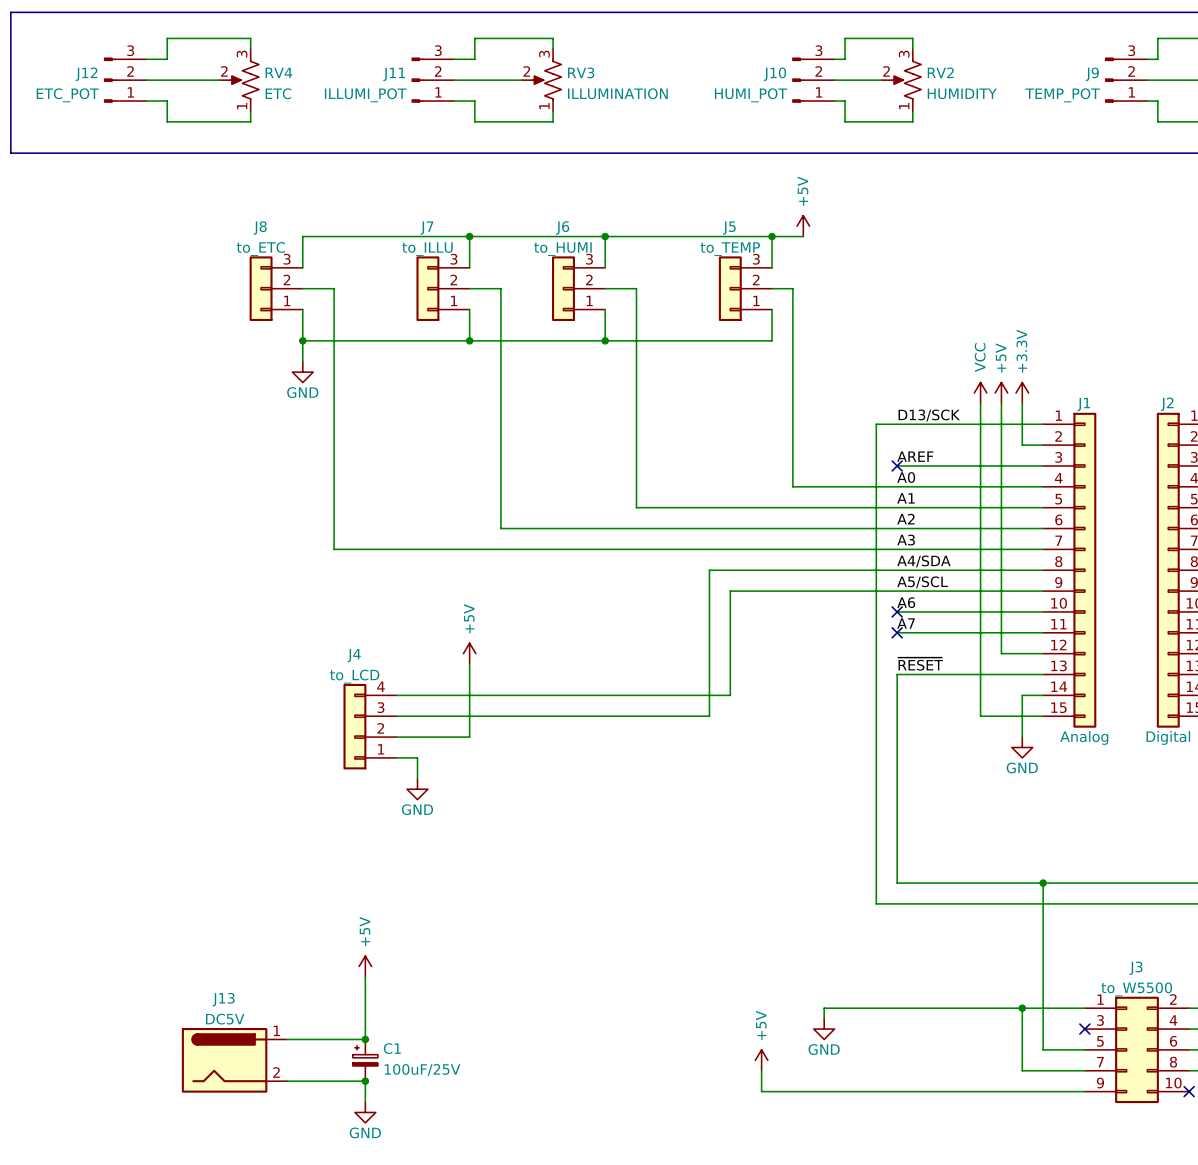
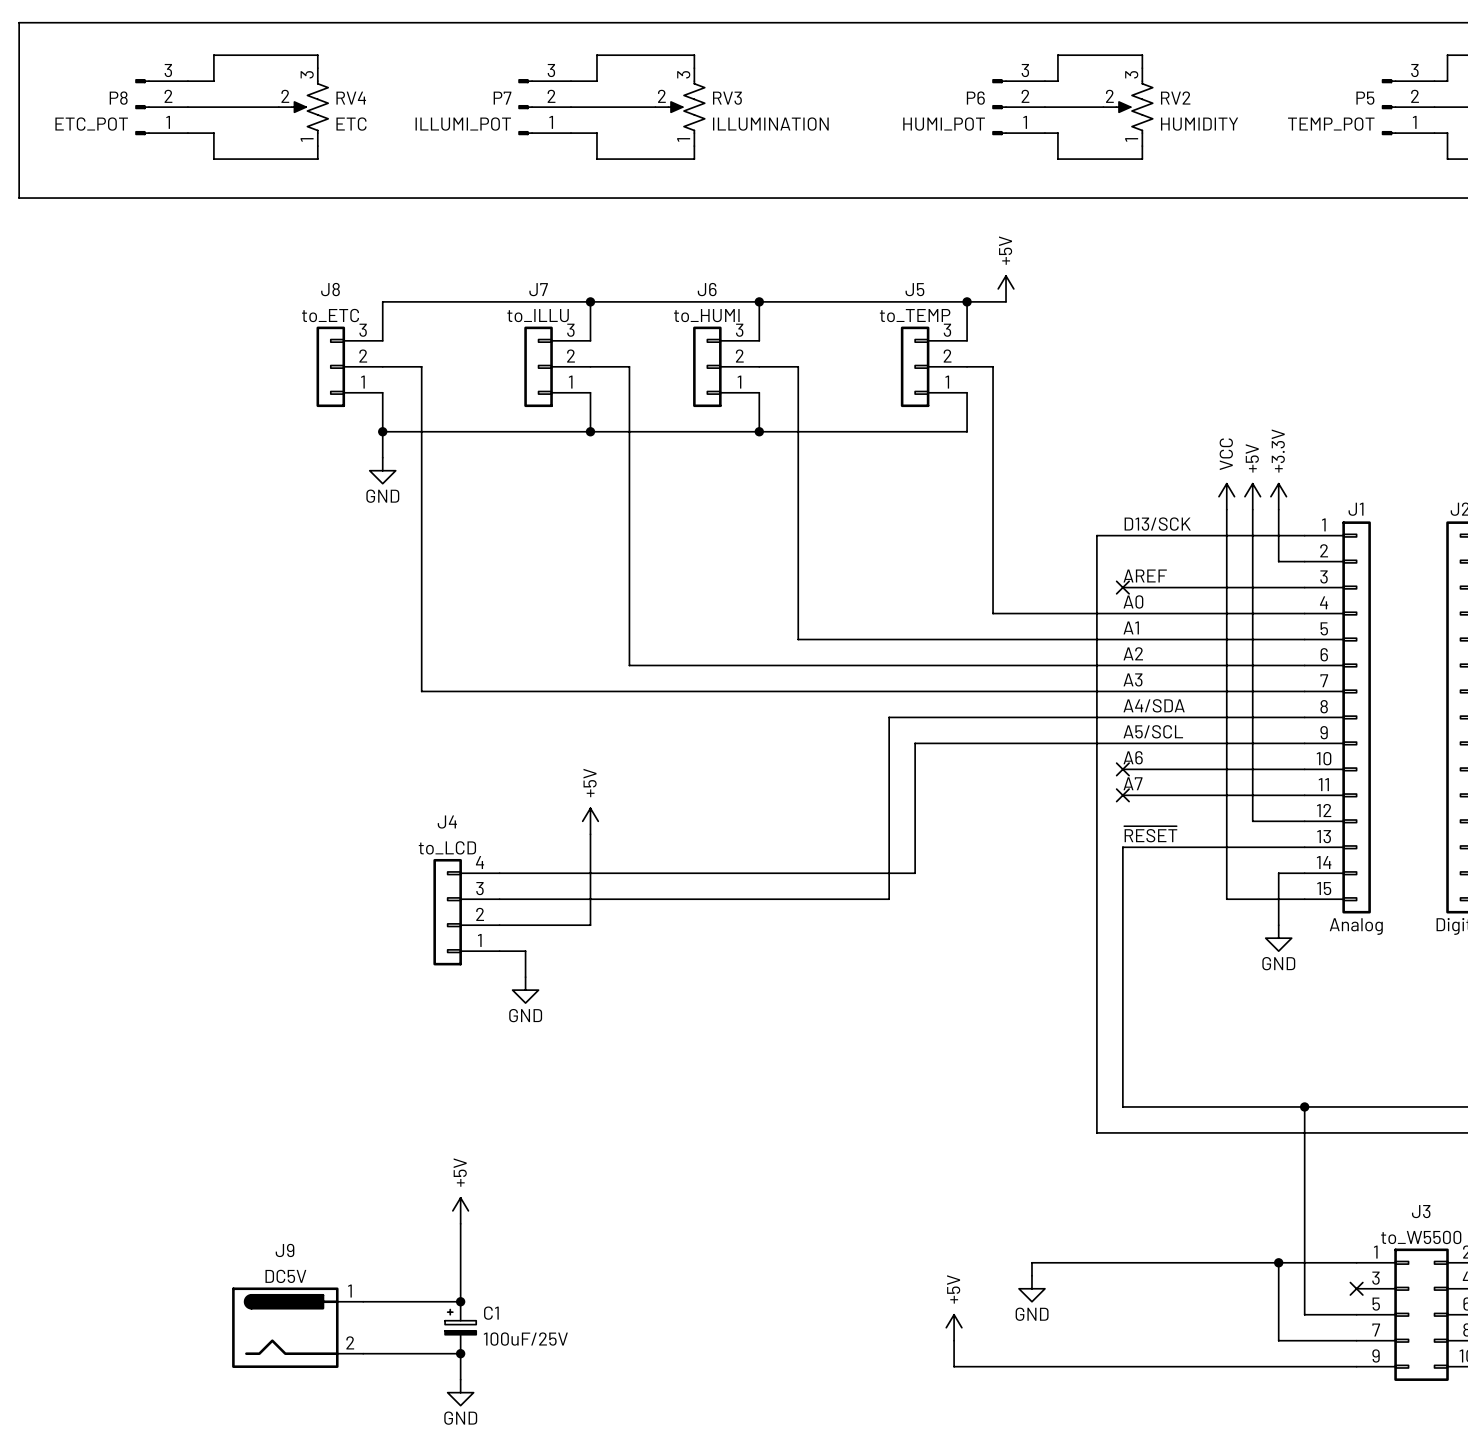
J12 name: J12 (86, 74) -> P8 (118, 98)
J11 name: J11 (394, 74) -> P7 (502, 98)
J10 name: J10 (774, 74) -> P6 (975, 98)
J9 name: J9 (1092, 74) -> P5 (1365, 98)
J13 name: J13 (223, 999) -> J9 (285, 1250)

